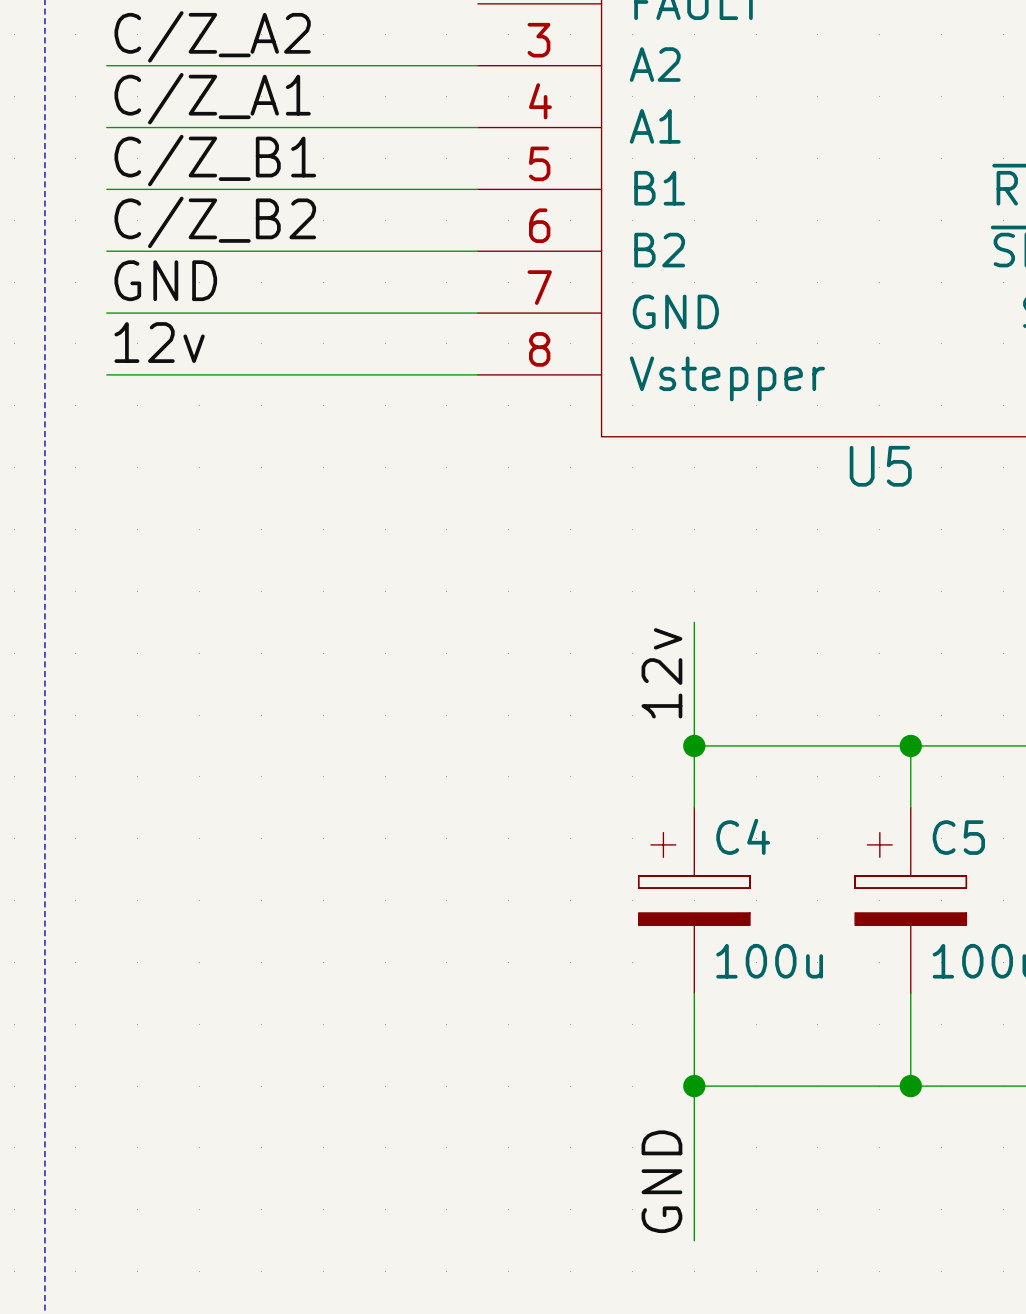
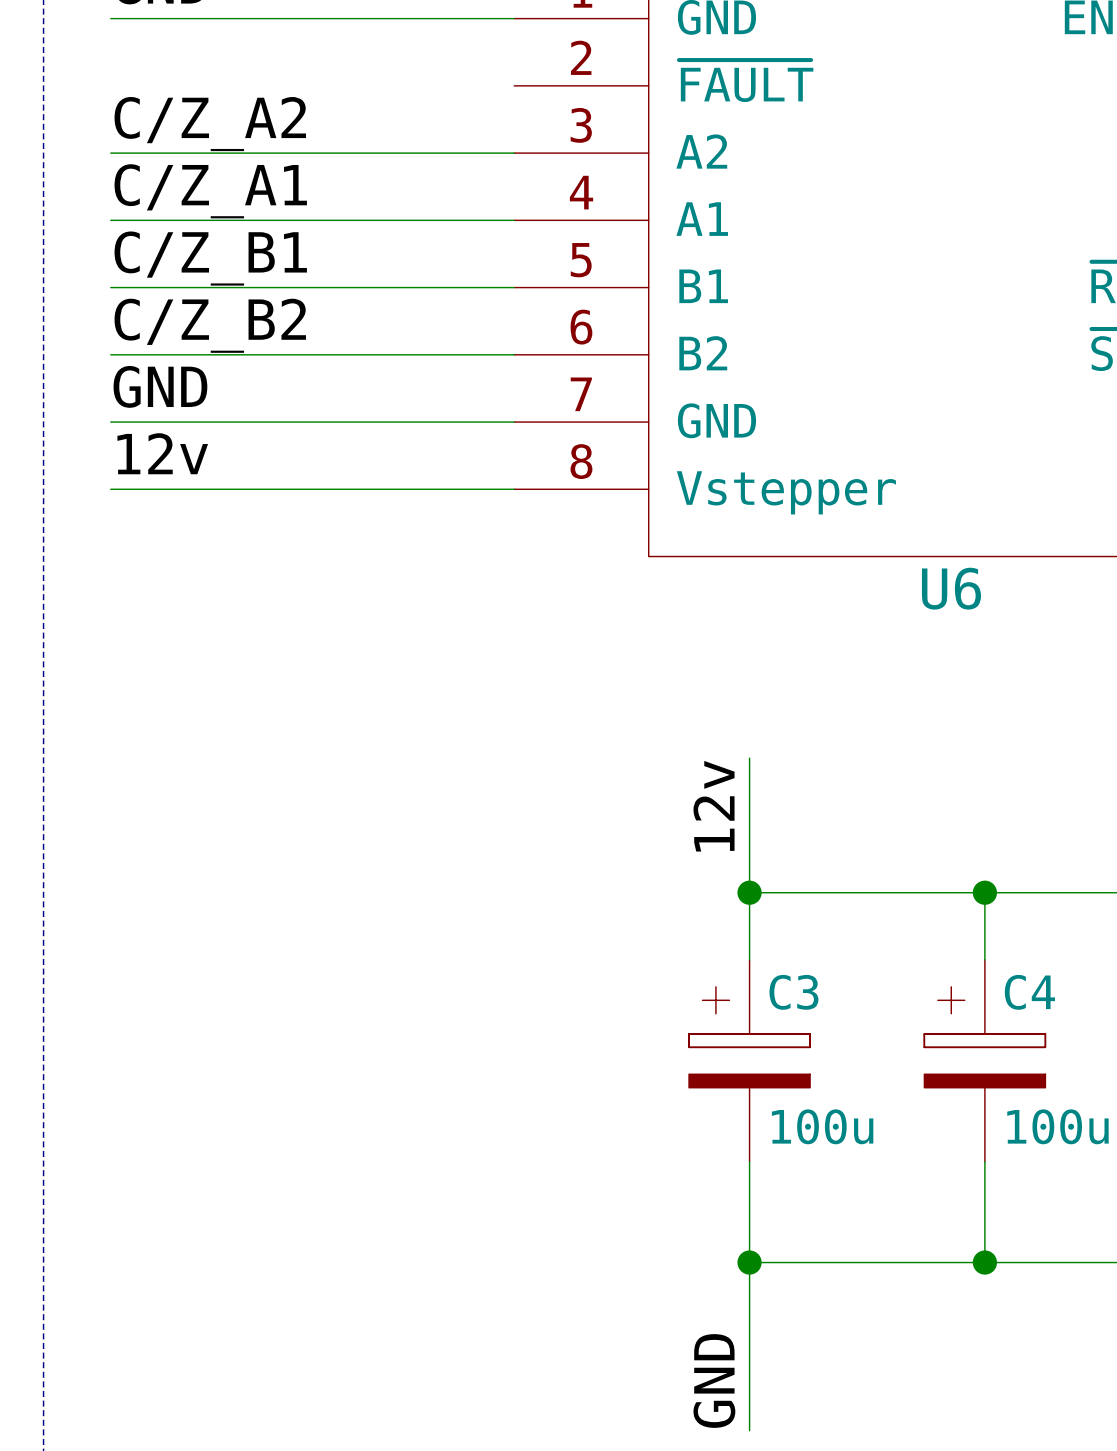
U5 name: U5 (880, 466) -> U6 (951, 588)
C4 name: C4 (743, 836) -> C3 (793, 992)
C5 name: C5 (958, 837) -> C4 (1029, 992)

